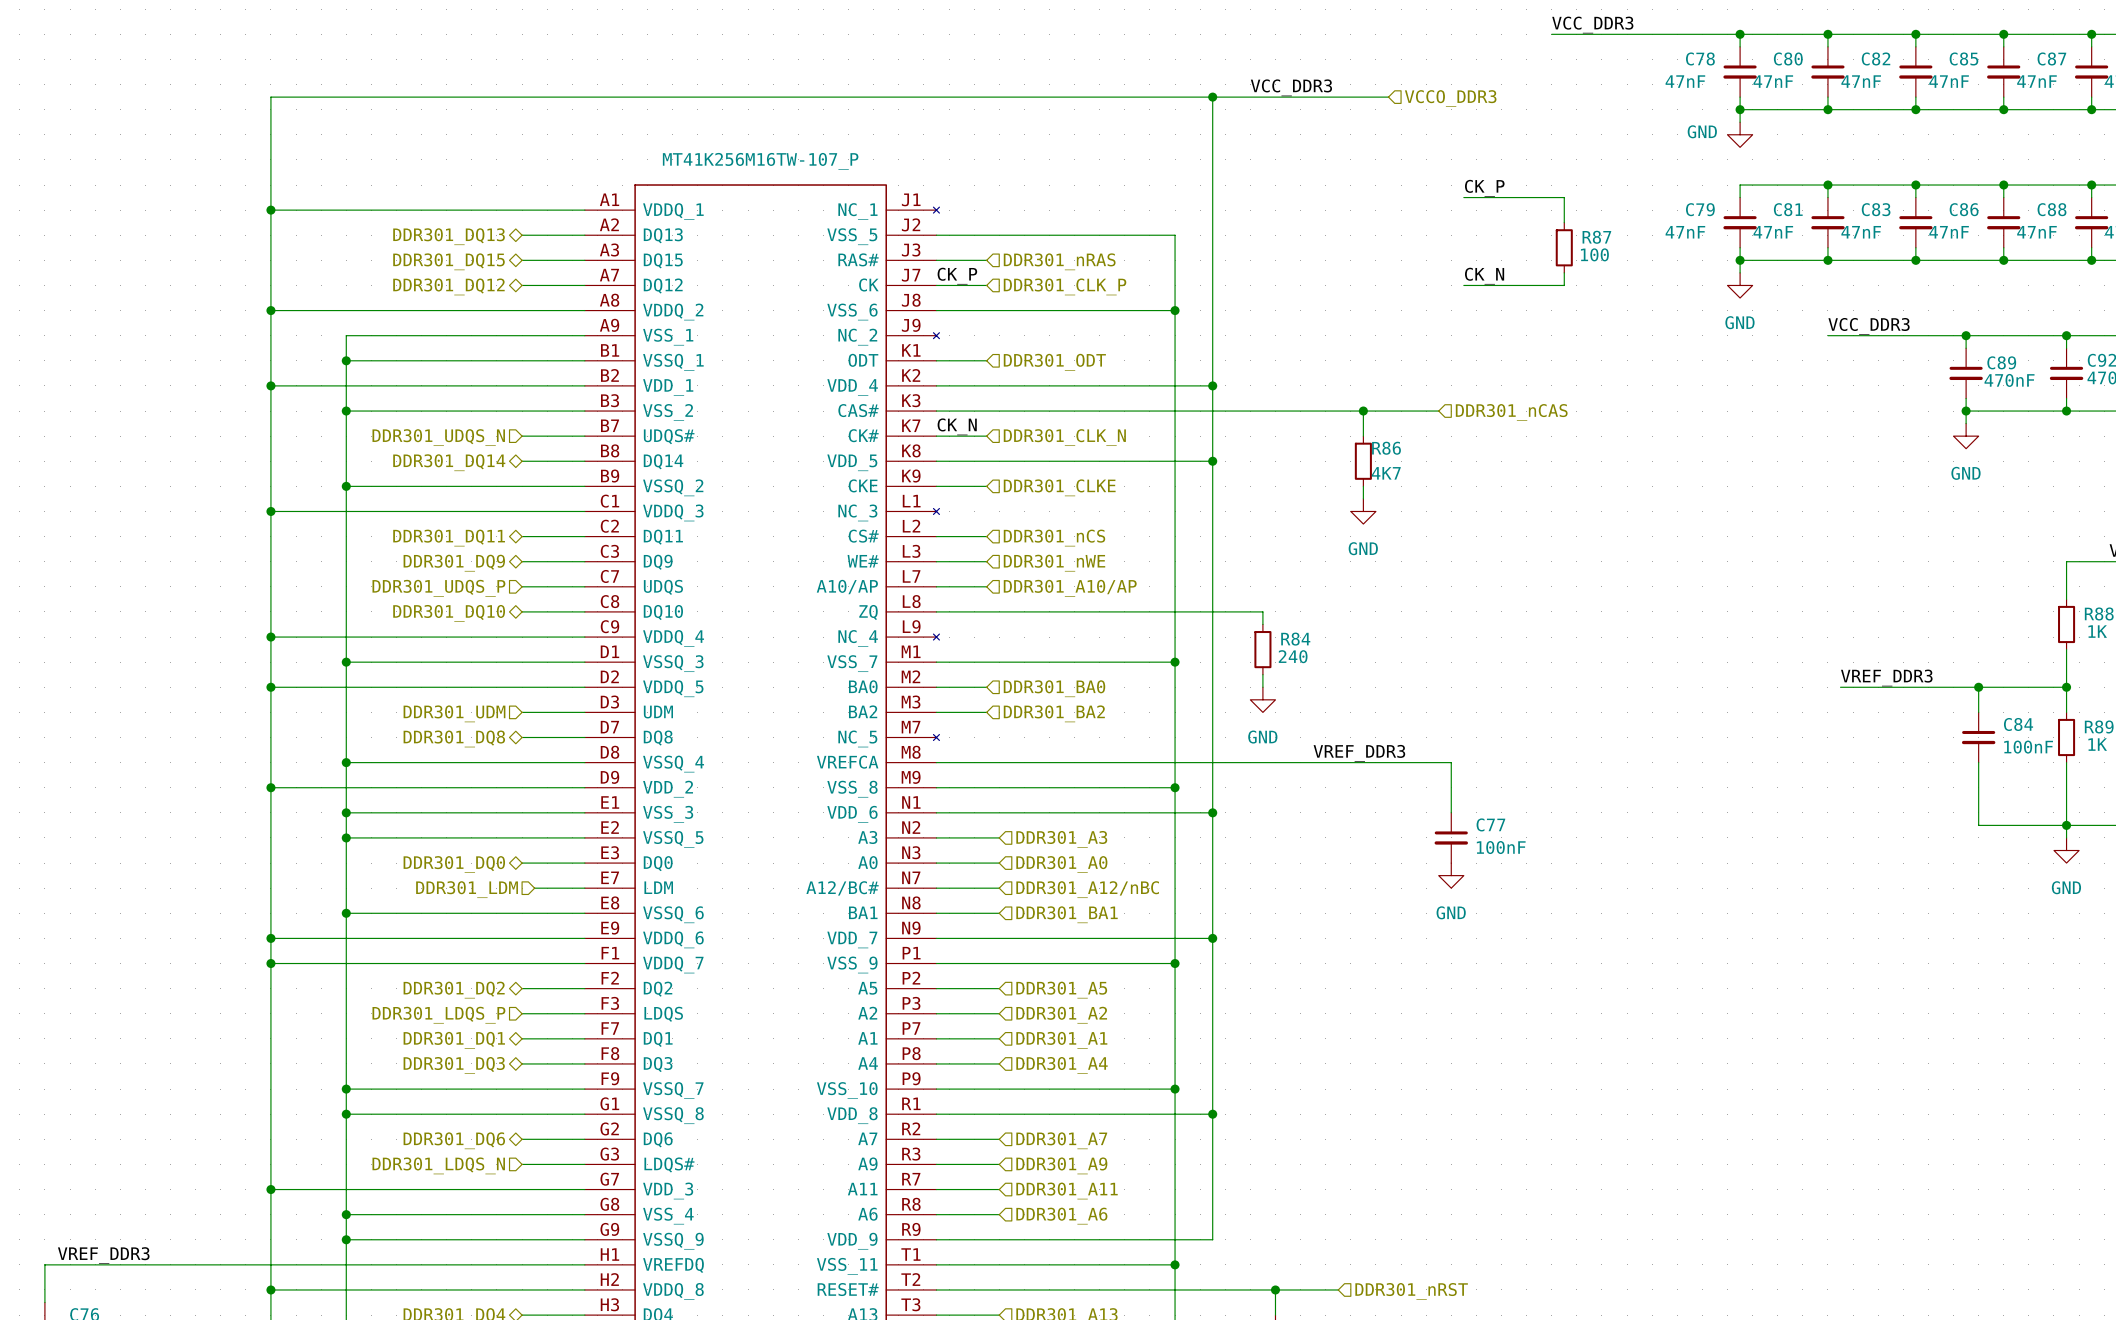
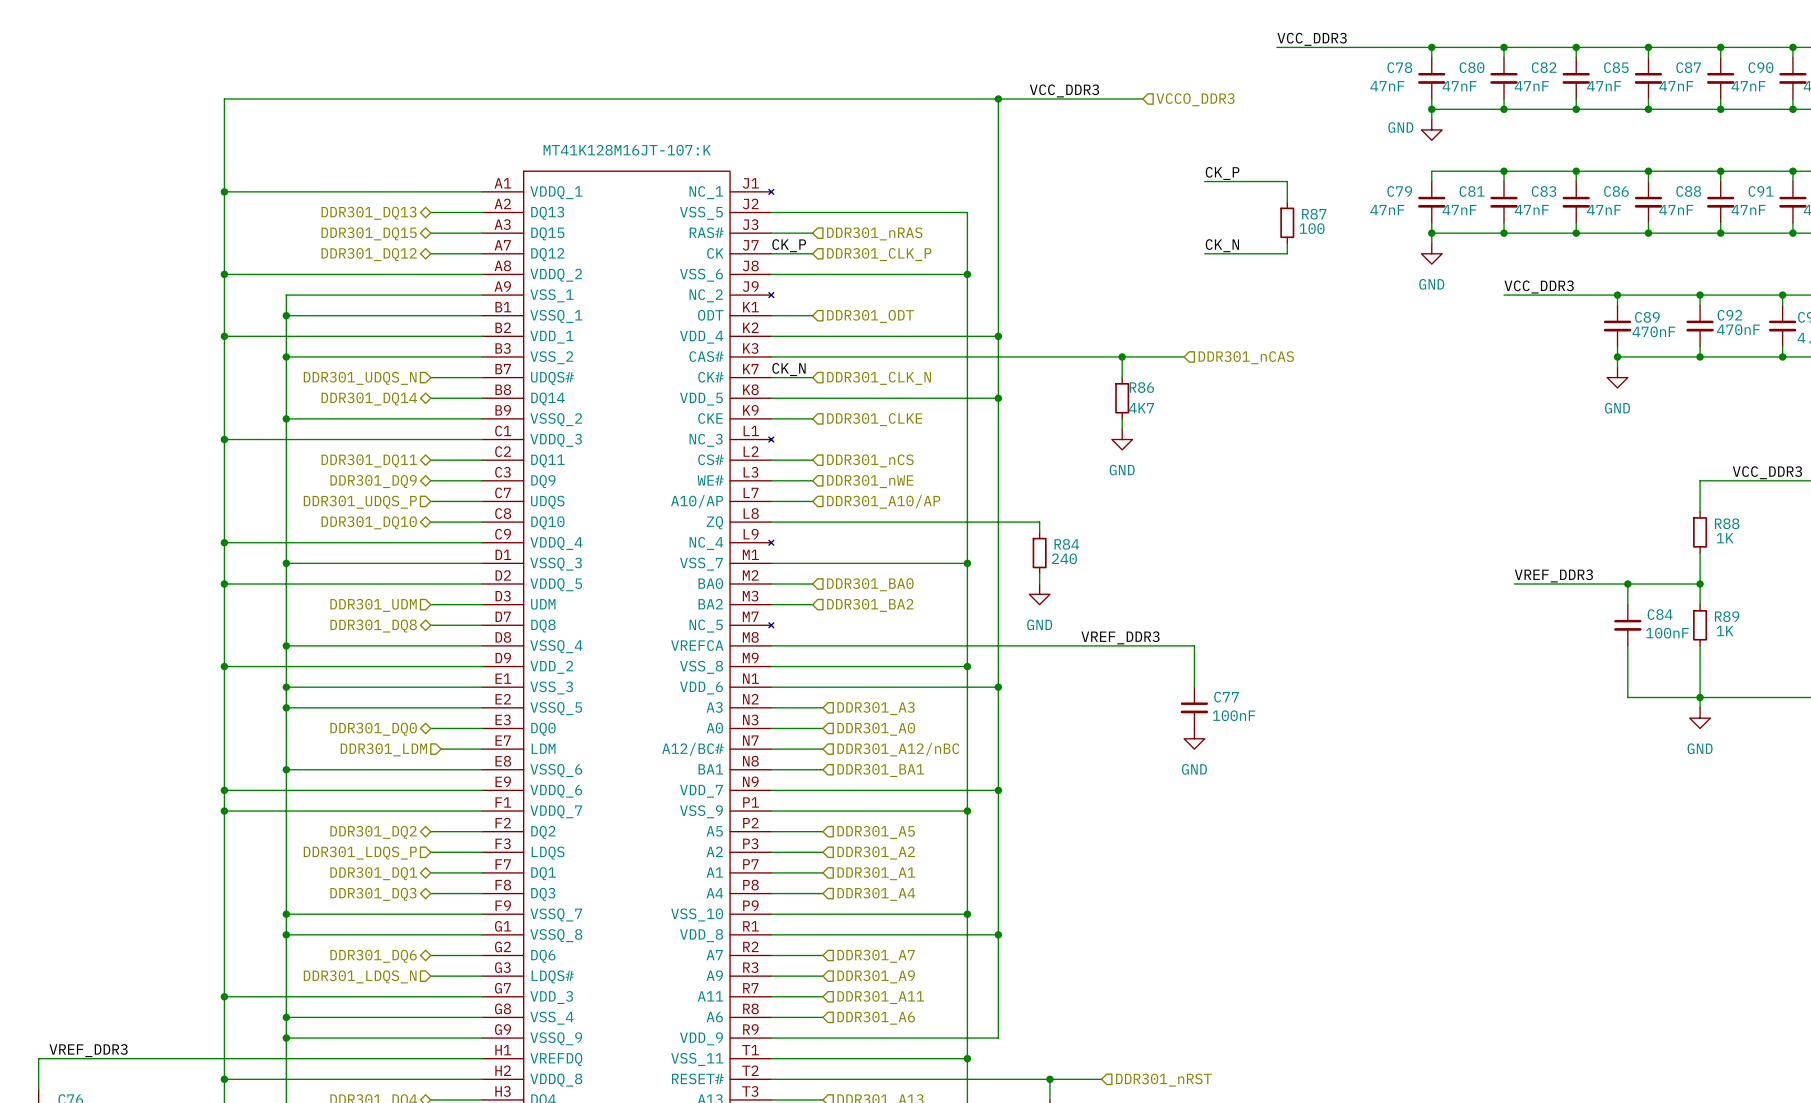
part value: MT41K256M16TW-107_P (760, 161) -> MT41K128M16JT-107:K (627, 150)

